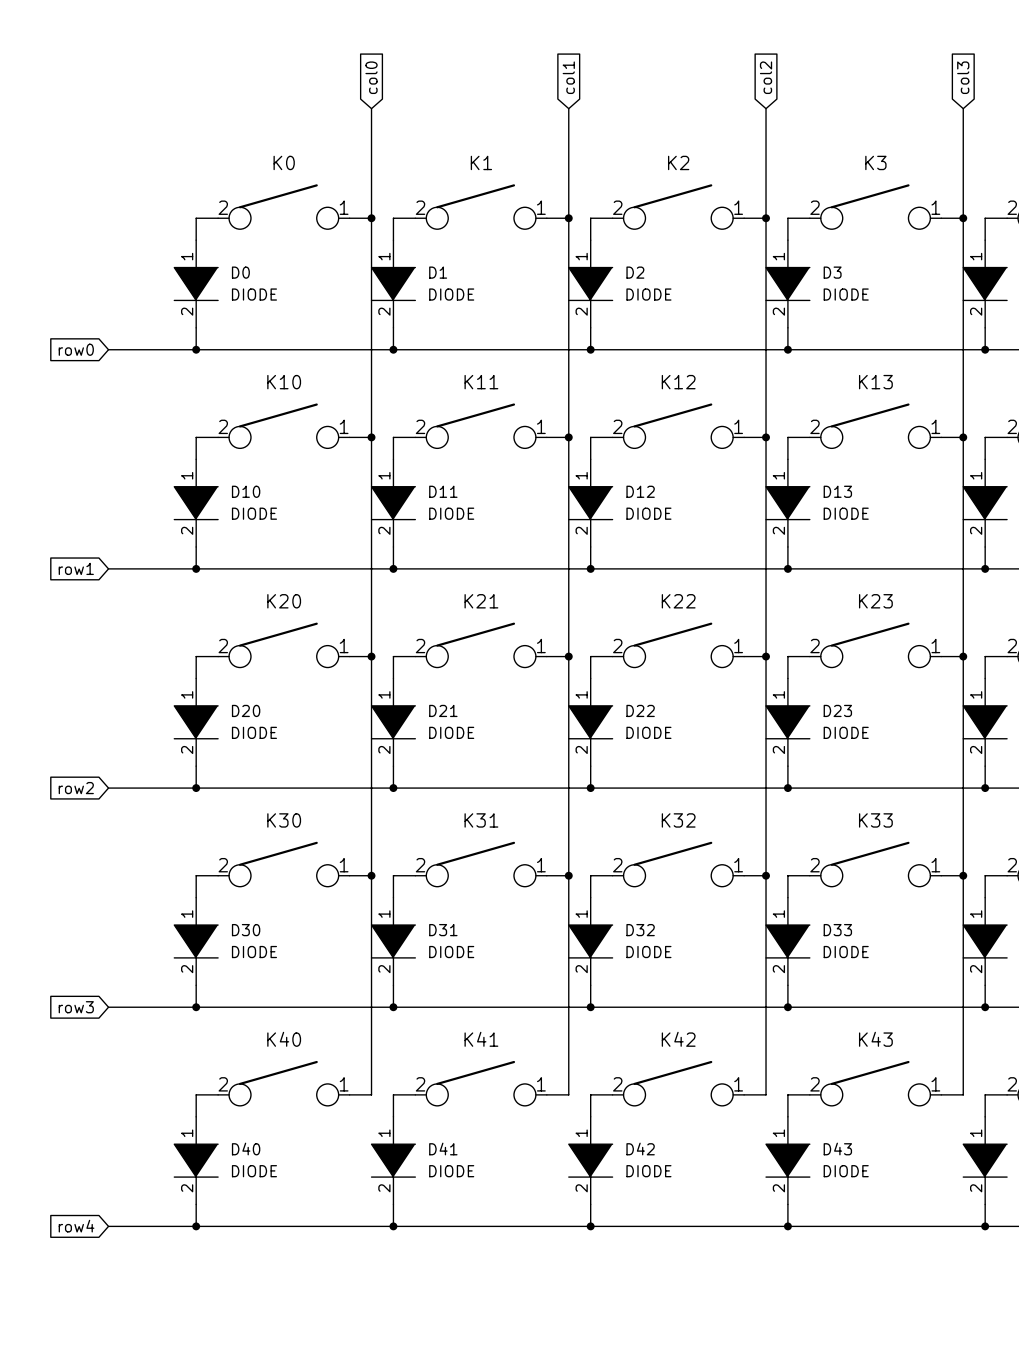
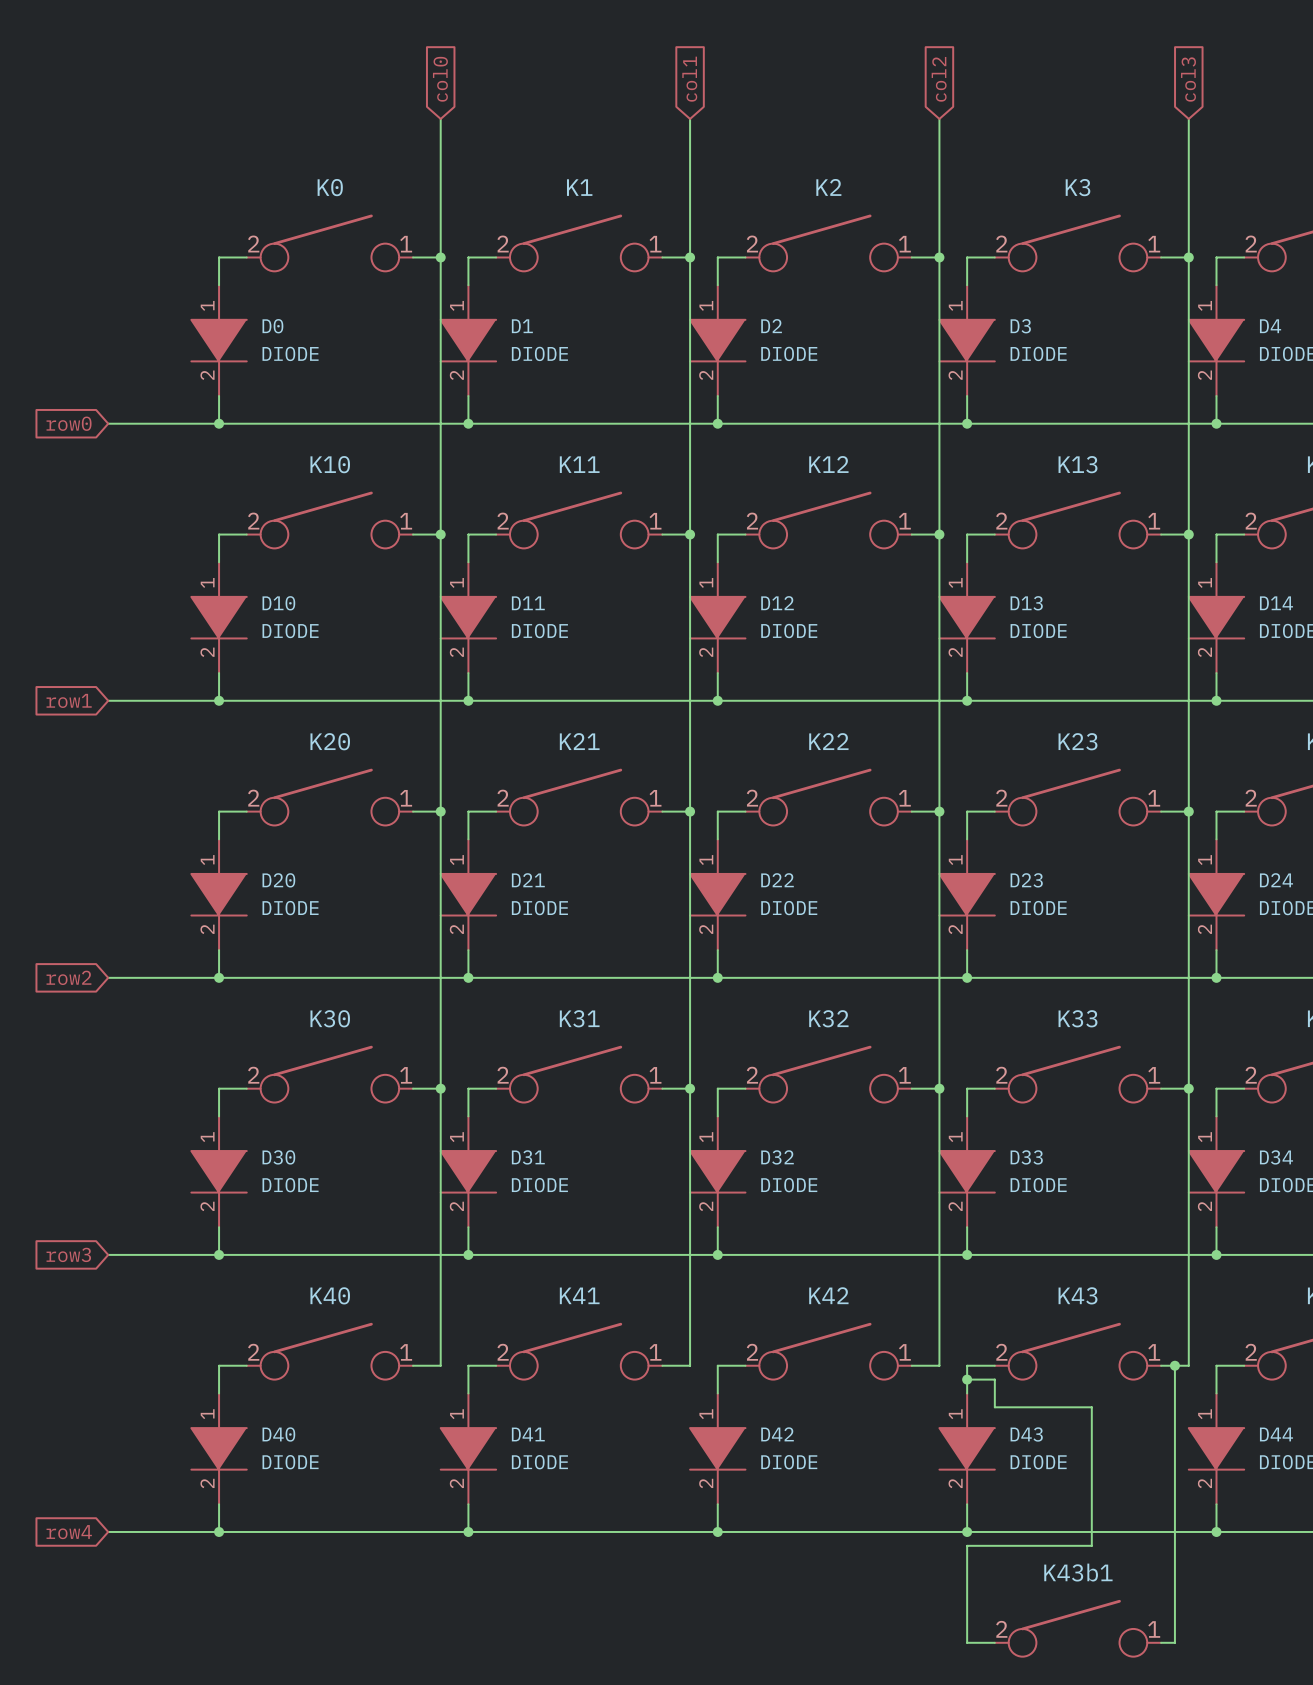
wire: none -> (1174, 1365) (1174, 1642) (1161, 1642)
junction: none -> (1174, 1365)
wire: none -> (967, 1379) (994, 1379) (994, 1407) (1091, 1407) (1091, 1545) (967, 1545) (967, 1642) (994, 1642)
junction: none -> (967, 1379)
K43b1: none -> (1077, 1628)

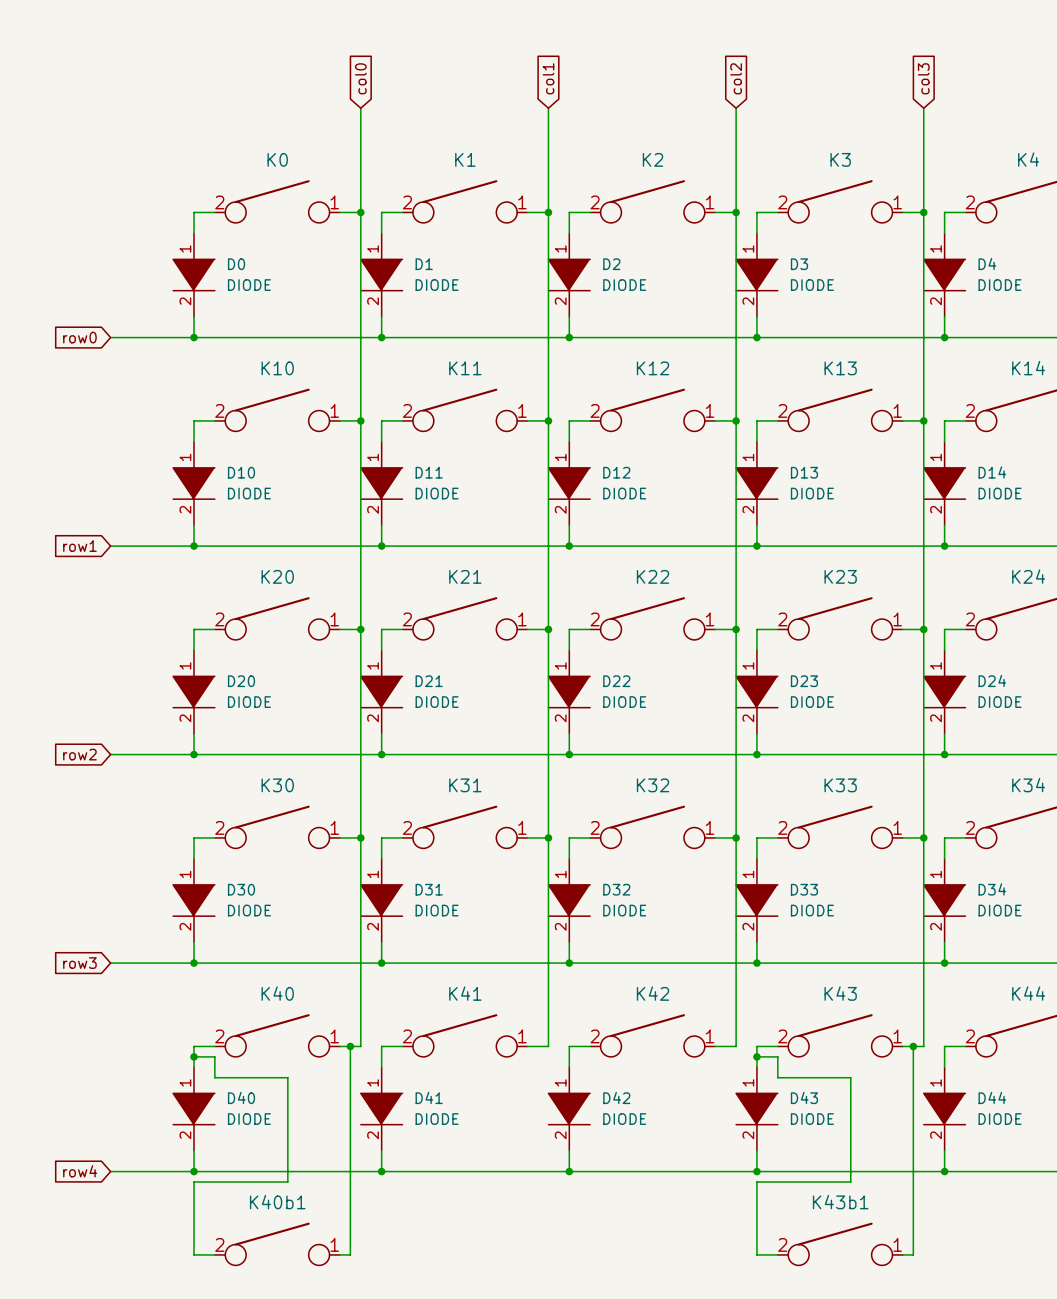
wire: none -> (350, 1046) (350, 1254) (339, 1254)
junction: none -> (350, 1046)
wire: none -> (194, 1056) (214, 1056) (214, 1077) (287, 1077) (287, 1181) (194, 1181) (194, 1254) (214, 1254)
junction: none -> (194, 1056)
K40b1: none -> (277, 1244)

